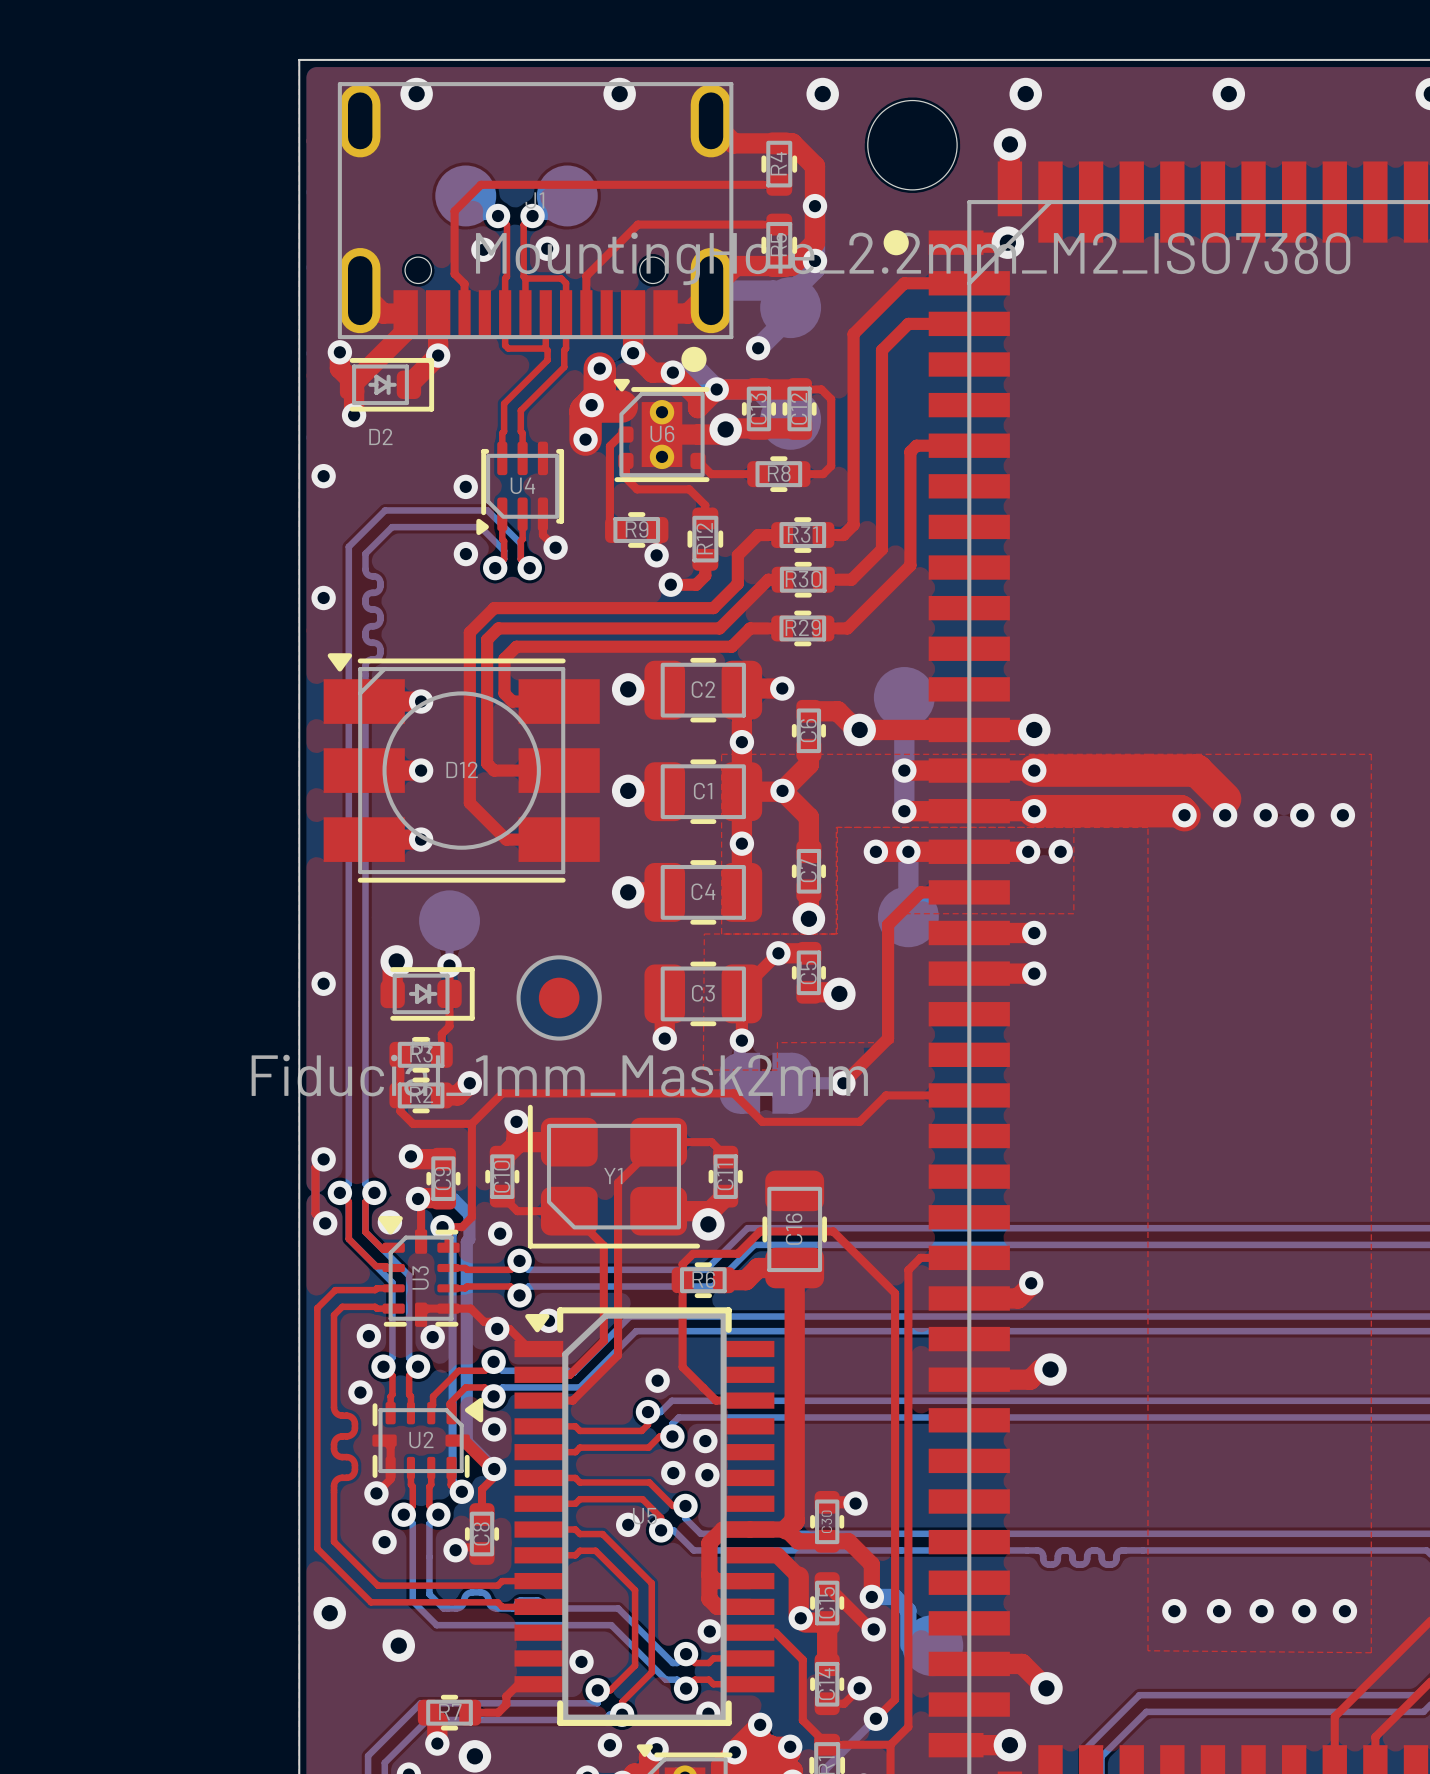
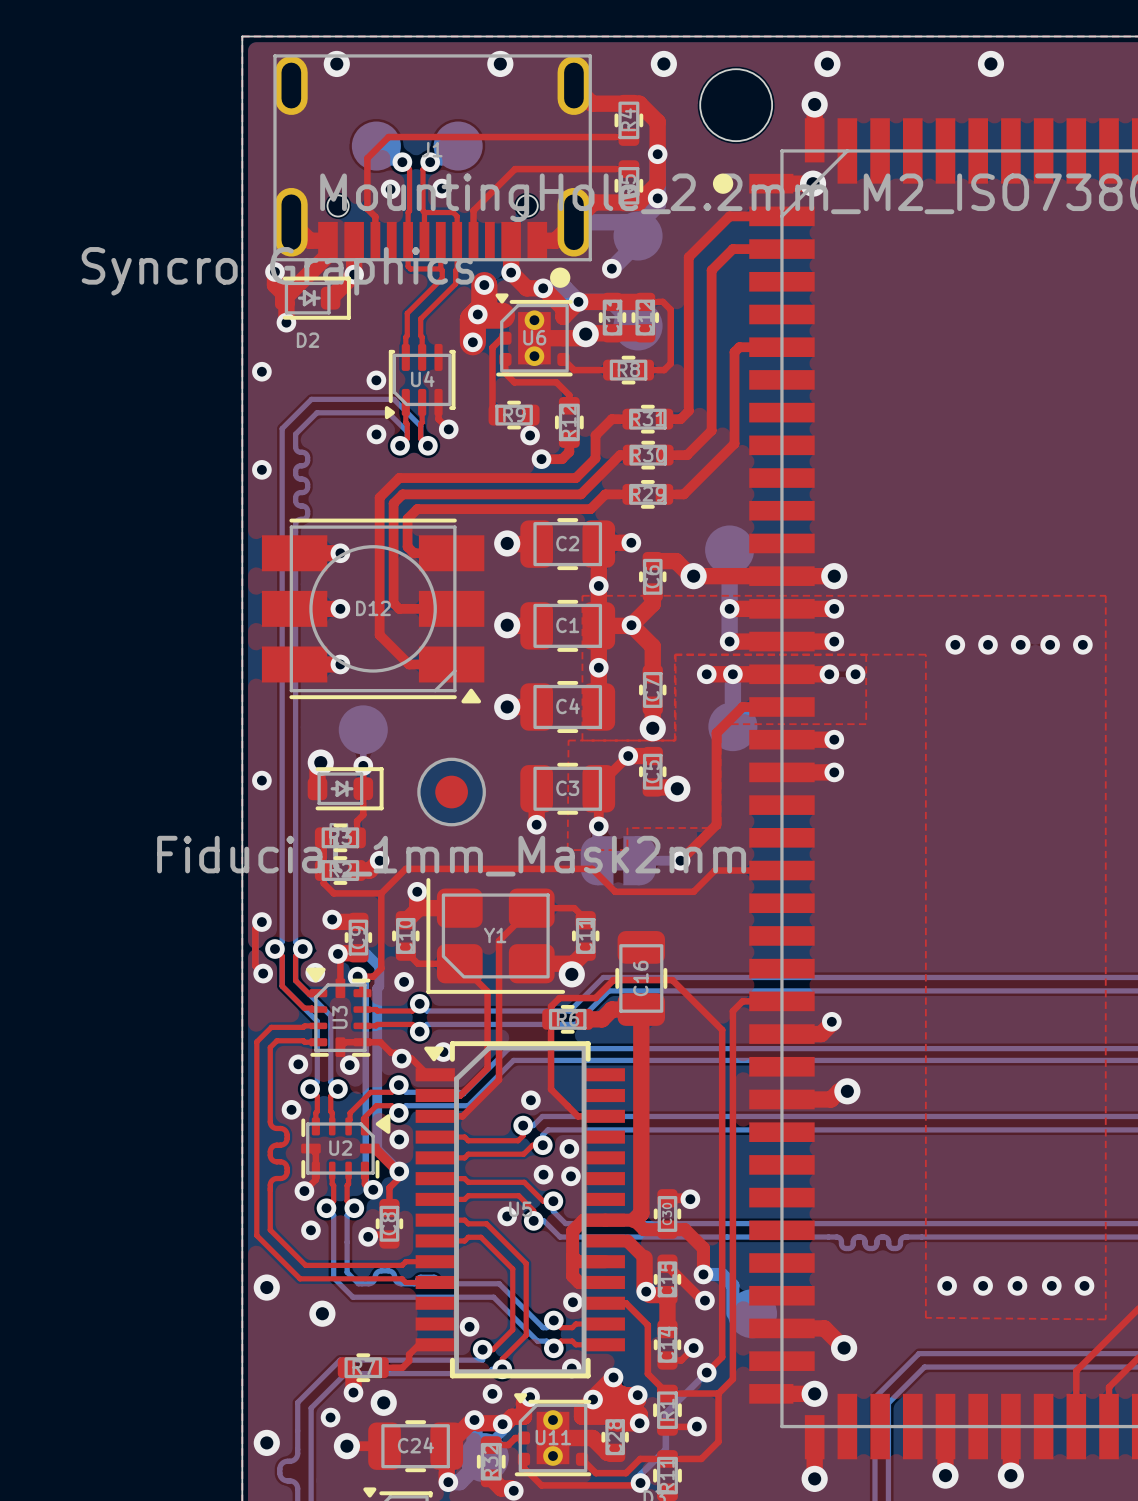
drawing: none -> [81, 247, 475, 296]
D12 rotation: 0° (461, 767) -> 180° (373, 610)
top track: (1034, 770) (1196, 770) (1225, 799) -> none
top track: (1034, 811) (1180, 811) (1184, 815) -> none

